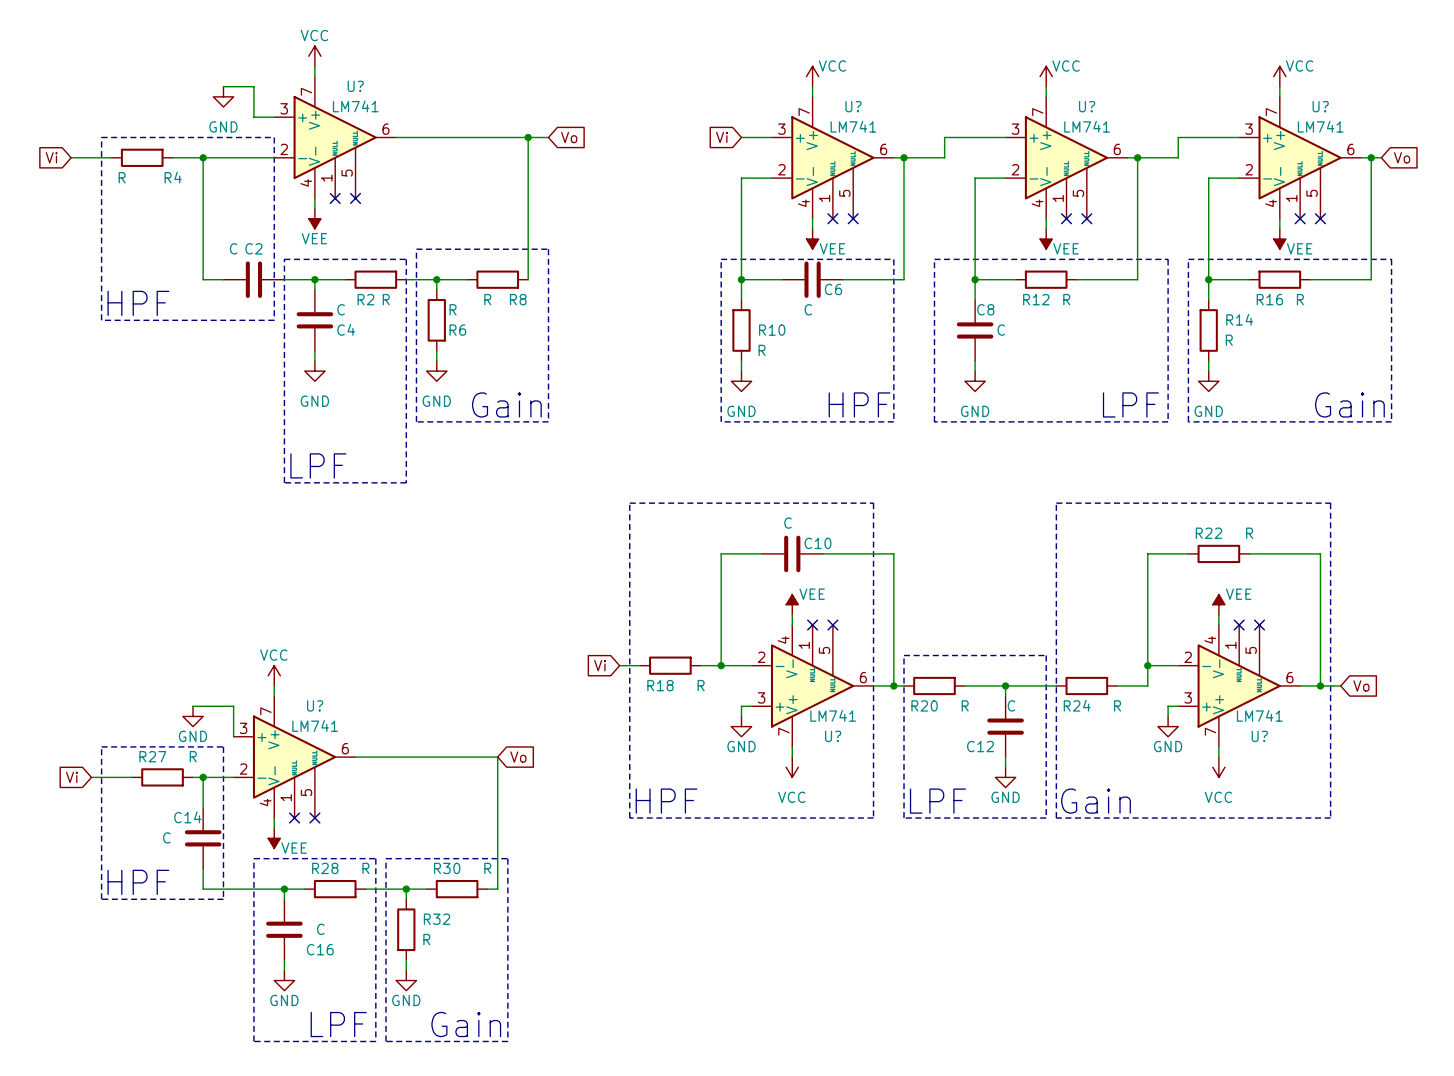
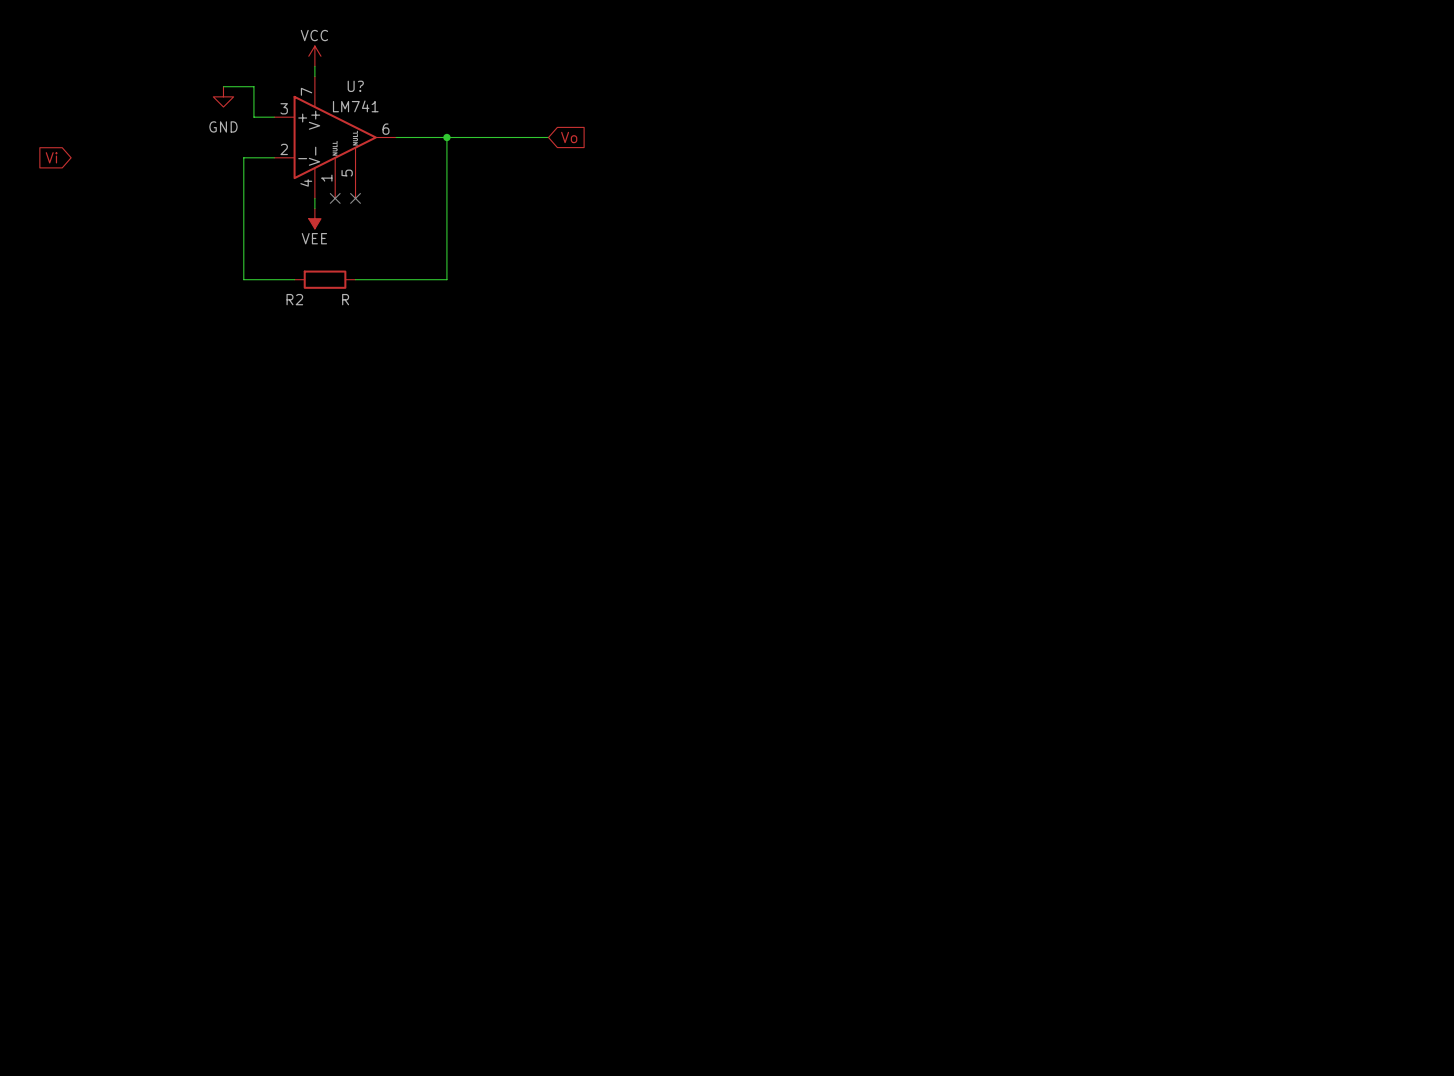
power symbol: VCC (812, 76) -> none
power symbol: VCC (1046, 76) -> none
power symbol: VCC (1279, 76) -> none
wire: (812, 86) (812, 96) -> none
wire: (1046, 86) (1046, 96) -> none
wire: (1279, 86) (1279, 96) -> none
line: (101, 137) (101, 320) (274, 320) (274, 137) (101, 137) -> none
junction: none -> (446, 137)
wire: (528, 137) (528, 279) -> none
junction: (528, 137) -> none
global label: Vi (722, 137) -> none
wire: (741, 137) (771, 137) -> none
wire: (1005, 137) (944, 137) (944, 157) (893, 157) -> none
wire: (1239, 137) (1178, 137) (1178, 157) (1127, 157) -> none
wire: (71, 157) (111, 157) -> none
R4: R (142, 157) -> none
wire: (172, 157) (243, 157) -> (284, 279) (243, 279) (243, 157)
wire: (203, 157) (203, 279) (223, 279) -> none
junction: (203, 157) -> none
U?: LM741 (832, 157) -> none
wire: (904, 157) (904, 279) (843, 279) -> none
junction: (904, 157) -> none
U?: LM741 (1066, 157) -> none
wire: (1137, 157) (1137, 279) (1076, 279) -> none
junction: (1137, 157) -> none
U?: LM741 (1300, 157) -> none
wire: (1361, 157) (1381, 157) -> none
wire: (1371, 157) (1371, 279) (1310, 279) -> none
junction: (1371, 157) -> none
global label: Vo (1402, 157) -> none
wire: (771, 178) (741, 178) (741, 300) -> none
wire: (1005, 178) (975, 178) (975, 300) -> none
wire: (1239, 178) (1208, 178) (1208, 300) -> none
wire: (812, 218) (812, 228) -> none
no-connect mark: (832, 218) -> none
no-connect mark: (853, 218) -> none
wire: (1046, 218) (1046, 228) -> none
no-connect mark: (1066, 218) -> none
no-connect mark: (1086, 218) -> none
wire: (1279, 218) (1279, 228) -> none
no-connect mark: (1300, 218) -> none
no-connect mark: (1320, 218) -> none
power symbol: VEE (812, 239) -> none
power symbol: VEE (1046, 239) -> none
power symbol: VEE (1279, 239) -> none
line: (416, 249) (548, 249) (548, 421) (416, 421) (416, 249) -> none
line: (284, 259) (406, 259) (406, 482) (284, 482) (284, 259) -> none
line: (721, 259) (893, 259) (893, 421) (721, 421) (721, 259) -> none
line: (934, 259) (1168, 259) (1168, 421) (934, 421) (934, 259) -> none
line: (1188, 259) (1391, 259) (1391, 421) (1188, 421) (1188, 259) -> none
C2: C (253, 279) -> none
wire: (294, 279) (345, 279) -> (355, 279) (406, 279)
wire: (314, 279) (314, 289) -> none
junction: (314, 279) -> none
R2 position: (375, 279) -> (325, 279)
wire: (436, 279) (436, 289) -> none
junction: (436, 279) -> none
wire: (446, 279) (467, 279) -> (446, 279) (446, 137)
R8: R (497, 279) -> none
wire: (741, 279) (782, 279) -> none
junction: (741, 279) -> none
C6: C (812, 279) -> none
wire: (975, 279) (1015, 279) -> none
junction: (975, 279) -> none
R12: R (1046, 279) -> none
wire: (1208, 279) (1249, 279) -> none
junction: (1208, 279) -> none
R16: R (1279, 279) -> none
R2 name position: R2 (365, 299) -> R2 (294, 299)
R2 value position: R (386, 299) -> R (345, 299)
text: HPF (138, 303) -> none
C4: C (314, 320) -> none
R6: R (436, 320) -> none
R10: R (741, 330) -> none
C8: C (975, 330) -> none
R14: R (1208, 330) -> none
wire: (314, 350) (314, 360) -> none
wire: (436, 350) (436, 360) -> none
wire: (741, 360) (741, 371) -> none
wire: (975, 360) (975, 371) -> none
wire: (1208, 360) (1208, 371) -> none
power symbol: GND (314, 371) -> none
power symbol: GND (436, 371) -> none
power symbol: GND (741, 381) -> none
power symbol: GND (975, 381) -> none
power symbol: GND (1208, 381) -> none
text: Gain (506, 404) -> none
text: HPF (859, 404) -> none
text: LPF (1130, 404) -> none
text: Gain (1349, 404) -> none
text: LPF (318, 465) -> none
line: (629, 503) (873, 503) (873, 818) (629, 818) (629, 503) -> none
line: (1056, 503) (1330, 503) (1330, 818) (1056, 818) (1056, 503) -> none
wire: (761, 553) (721, 553) (721, 665) -> none
C10: C (792, 553) -> none
wire: (822, 553) (893, 553) (893, 685) -> none
wire: (1188, 553) (1147, 553) (1147, 685) (1117, 685) -> none
R22: R (1218, 553) -> none
wire: (1249, 553) (1320, 553) (1320, 685) -> none
power symbol: VEE (792, 604) -> none
power symbol: VEE (1218, 604) -> none
wire: (792, 614) (792, 625) -> none
wire: (1218, 614) (1218, 625) -> none
no-connect mark: (812, 625) -> none
no-connect mark: (832, 625) -> none
no-connect mark: (1239, 625) -> none
no-connect mark: (1259, 625) -> none
line: (904, 655) (1046, 655) (1046, 818) (904, 818) (904, 655) -> none
global label: Vi (600, 665) -> none
wire: (619, 665) (639, 665) -> none
R18: R (670, 665) -> none
wire: (700, 665) (751, 665) -> none
junction: (721, 665) -> none
wire: (1147, 665) (1178, 665) -> none
junction: (1147, 665) -> none
power symbol: VCC (274, 675) -> none
wire: (274, 685) (274, 696) -> none
U?: LM741 (812, 685) -> none
wire: (873, 685) (904, 685) -> none
junction: (893, 685) -> none
R20: R (934, 685) -> none
wire: (964, 685) (1056, 685) -> none
wire: (1005, 685) (1005, 696) -> none
junction: (1005, 685) -> none
R24: R (1086, 685) -> none
U?: LM741 (1239, 685) -> none
wire: (1300, 685) (1340, 685) -> none
junction: (1320, 685) -> none
global label: Vo (1361, 685) -> none
wire: (193, 706) (233, 706) (233, 736) -> none
wire: (751, 706) (741, 706) (741, 716) -> none
wire: (1178, 706) (1168, 706) (1168, 716) -> none
power symbol: GND (193, 716) -> none
power symbol: GND (741, 726) -> none
C12: C (1005, 726) -> none
power symbol: GND (1168, 726) -> none
line: (101, 746) (223, 746) (223, 899) (101, 899) (101, 746) -> none
wire: (792, 746) (792, 757) -> none
wire: (1218, 746) (1218, 757) -> none
U?: LM741 (294, 757) -> none
wire: (355, 757) (497, 757) (497, 889) (487, 889) -> none
global label: Vo (518, 757) -> none
wire: (1005, 757) (1005, 767) -> none
power symbol: VCC (792, 767) -> none
power symbol: VCC (1218, 767) -> none
global label: Vi (71, 777) -> none
wire: (91, 777) (132, 777) -> none
R27: R (162, 777) -> none
wire: (193, 777) (233, 777) -> none
wire: (203, 777) (203, 807) -> none
junction: (203, 777) -> none
power symbol: GND (1005, 777) -> none
text: HPF (666, 801) -> none
text: LPF (937, 801) -> none
text: Gain (1096, 801) -> none
wire: (274, 818) (274, 828) -> none
no-connect mark: (294, 818) -> none
no-connect mark: (314, 818) -> none
C14: C (203, 838) -> none
power symbol: VEE (274, 838) -> none
line: (253, 858) (375, 858) (375, 1041) (253, 1041) (253, 858) -> none
line: (385, 858) (507, 858) (507, 1041) (385, 1041) (385, 858) -> none
wire: (203, 868) (203, 889) (304, 889) -> none
text: HPF (138, 882) -> none
wire: (284, 889) (284, 899) -> none
junction: (284, 889) -> none
R28: R (335, 889) -> none
wire: (365, 889) (426, 889) -> none
wire: (406, 889) (406, 899) -> none
junction: (406, 889) -> none
R30: R (457, 889) -> none
C16: C (284, 929) -> none
R32: R (406, 929) -> none
wire: (284, 960) (284, 970) -> none
wire: (406, 960) (406, 970) -> none
power symbol: GND (284, 980) -> none
power symbol: GND (406, 980) -> none
text: LPF (338, 1024) -> none
text: Gain (466, 1024) -> none

